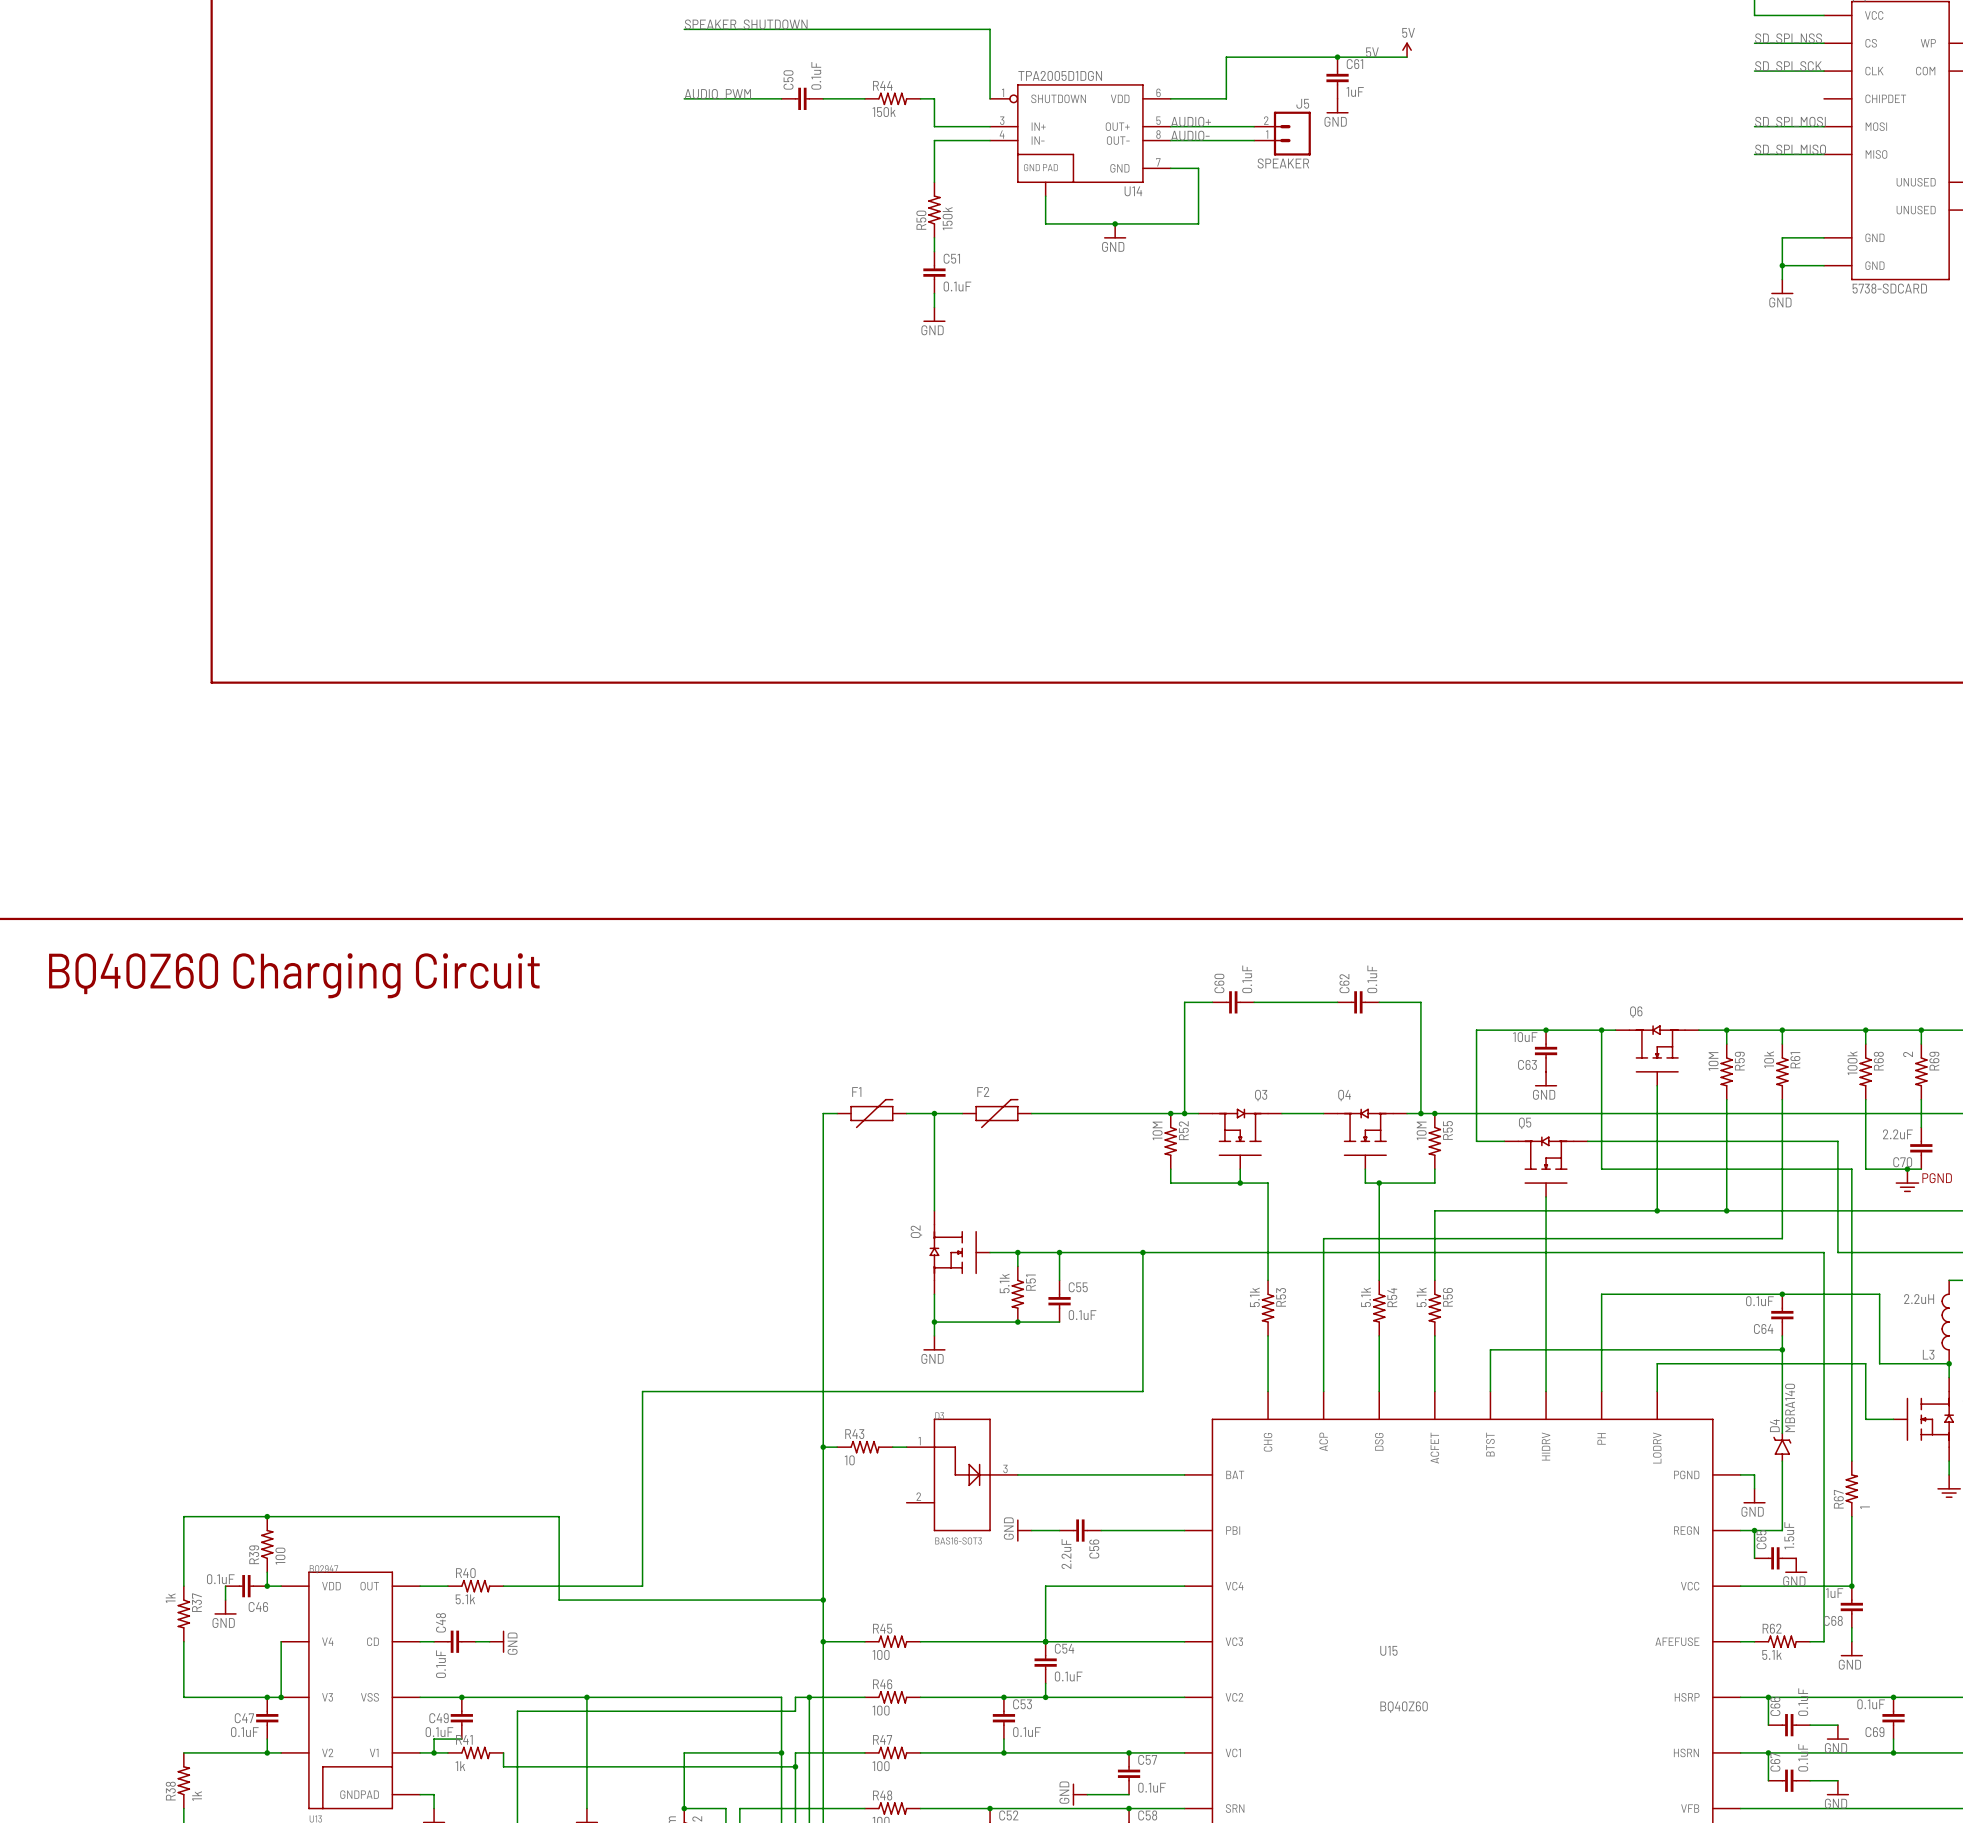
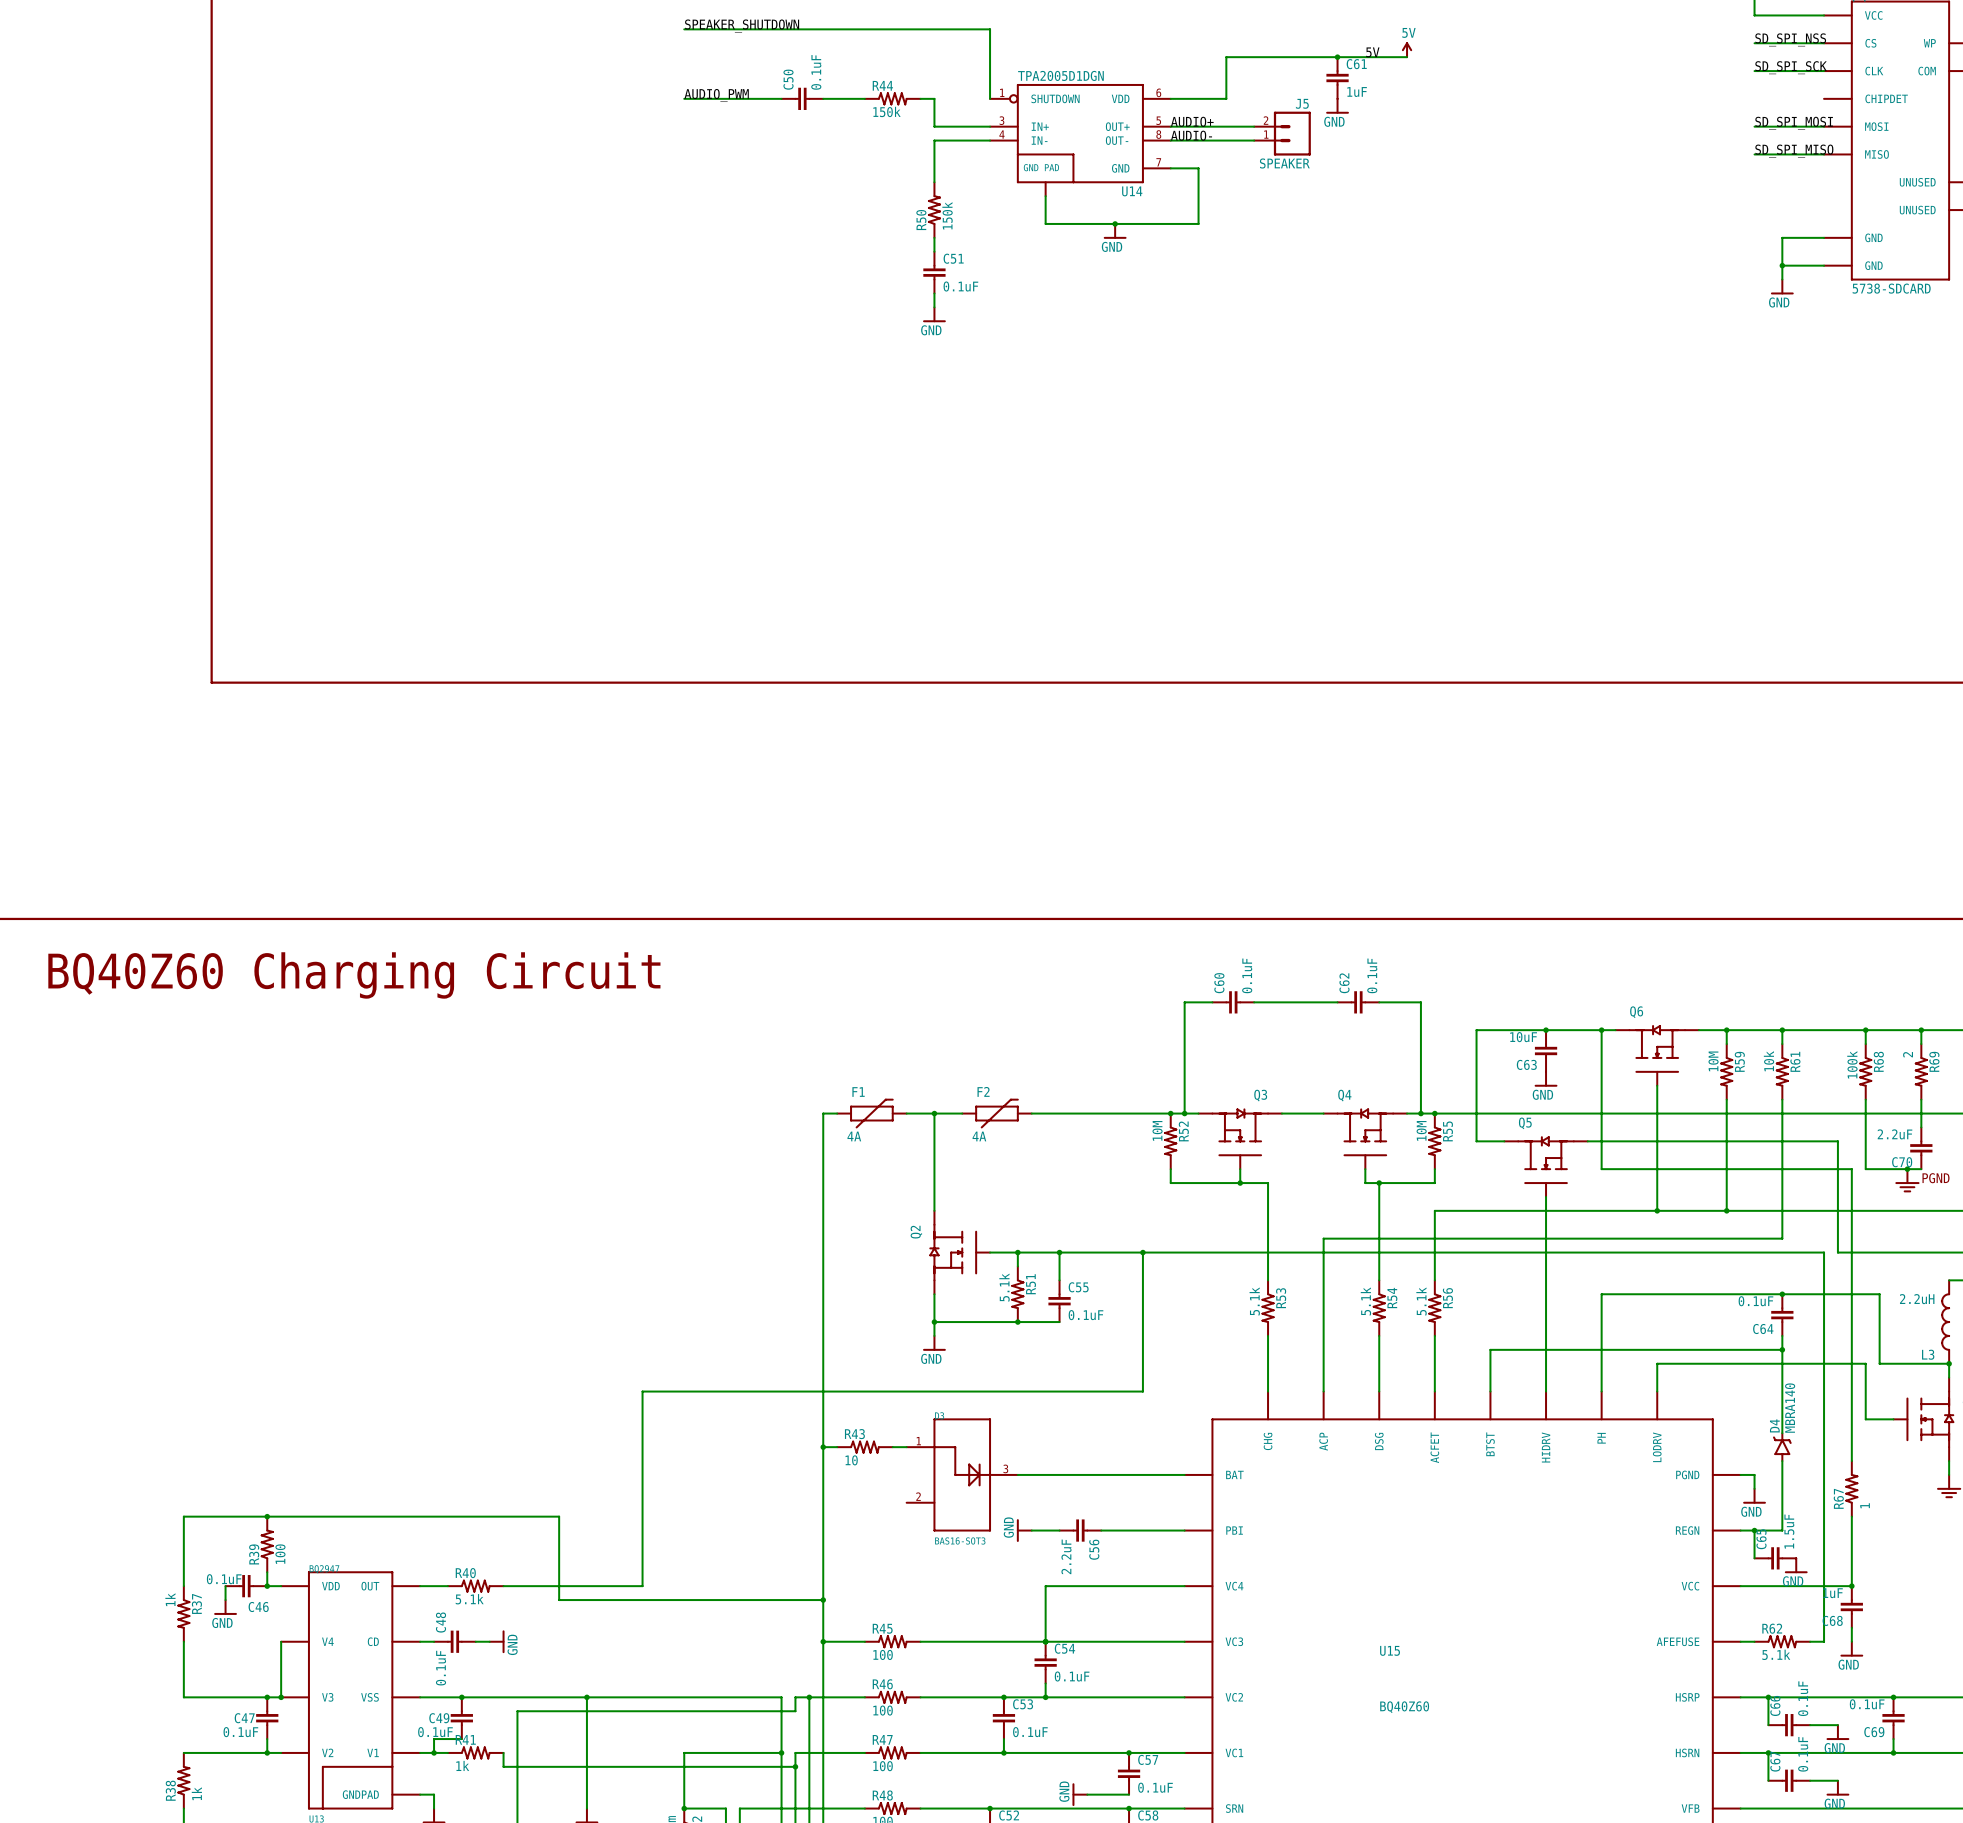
F1 value: none -> 4A (854, 1136)
F2 value: none -> 4A (979, 1136)

